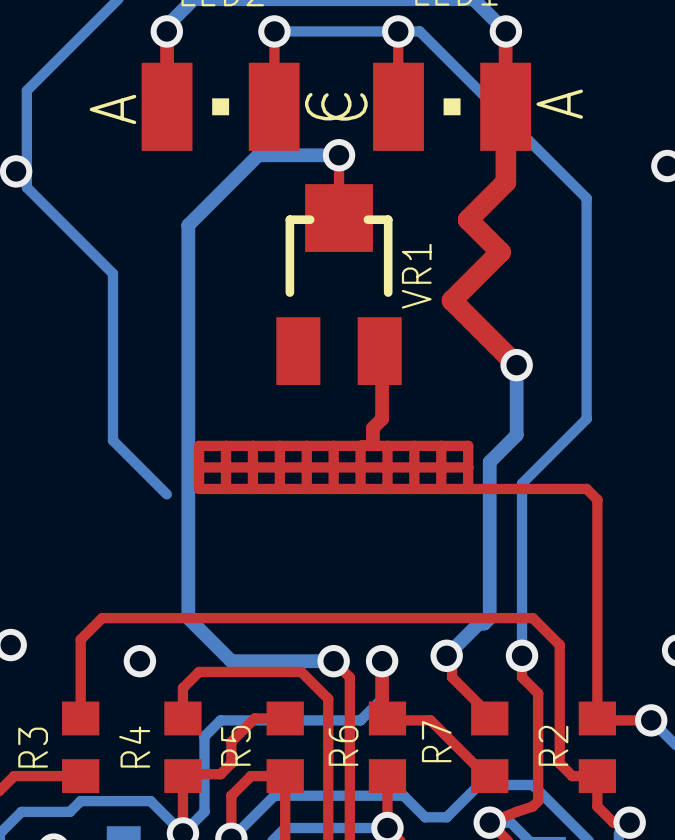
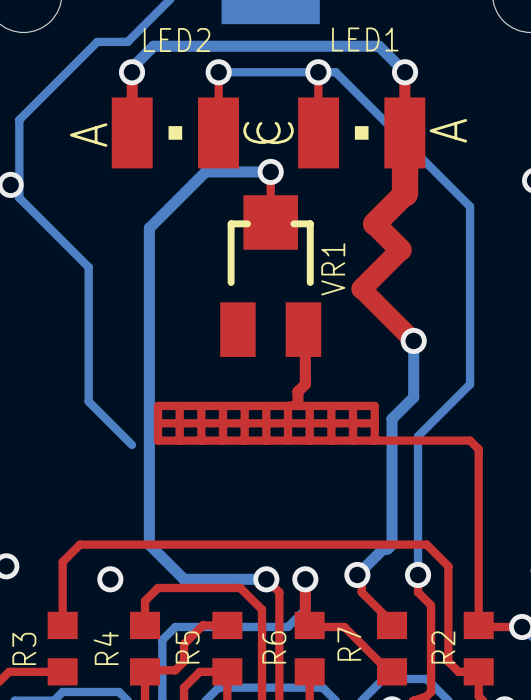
top track width: thin (505, 107) (505, 182) (468, 219) (500, 252) (452, 300) (516, 365) -> thick (405, 133) (405, 193) (374, 223) (400, 249) (361, 288) (413, 340)

